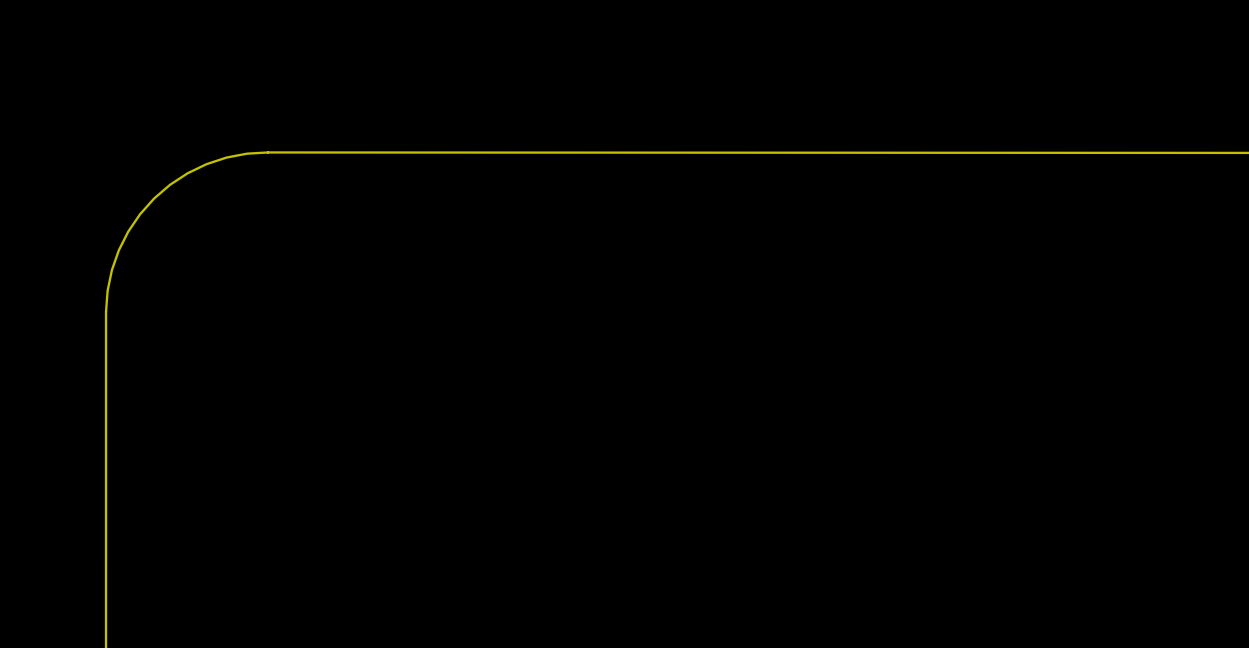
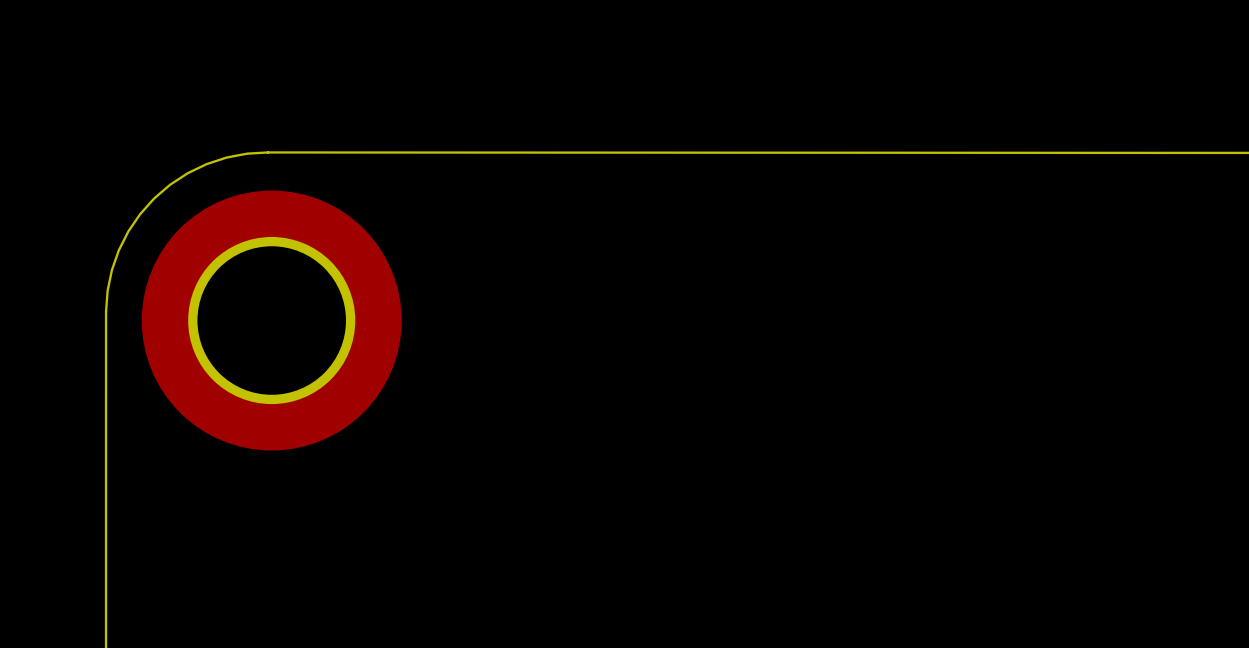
part: none -> (271, 320)

